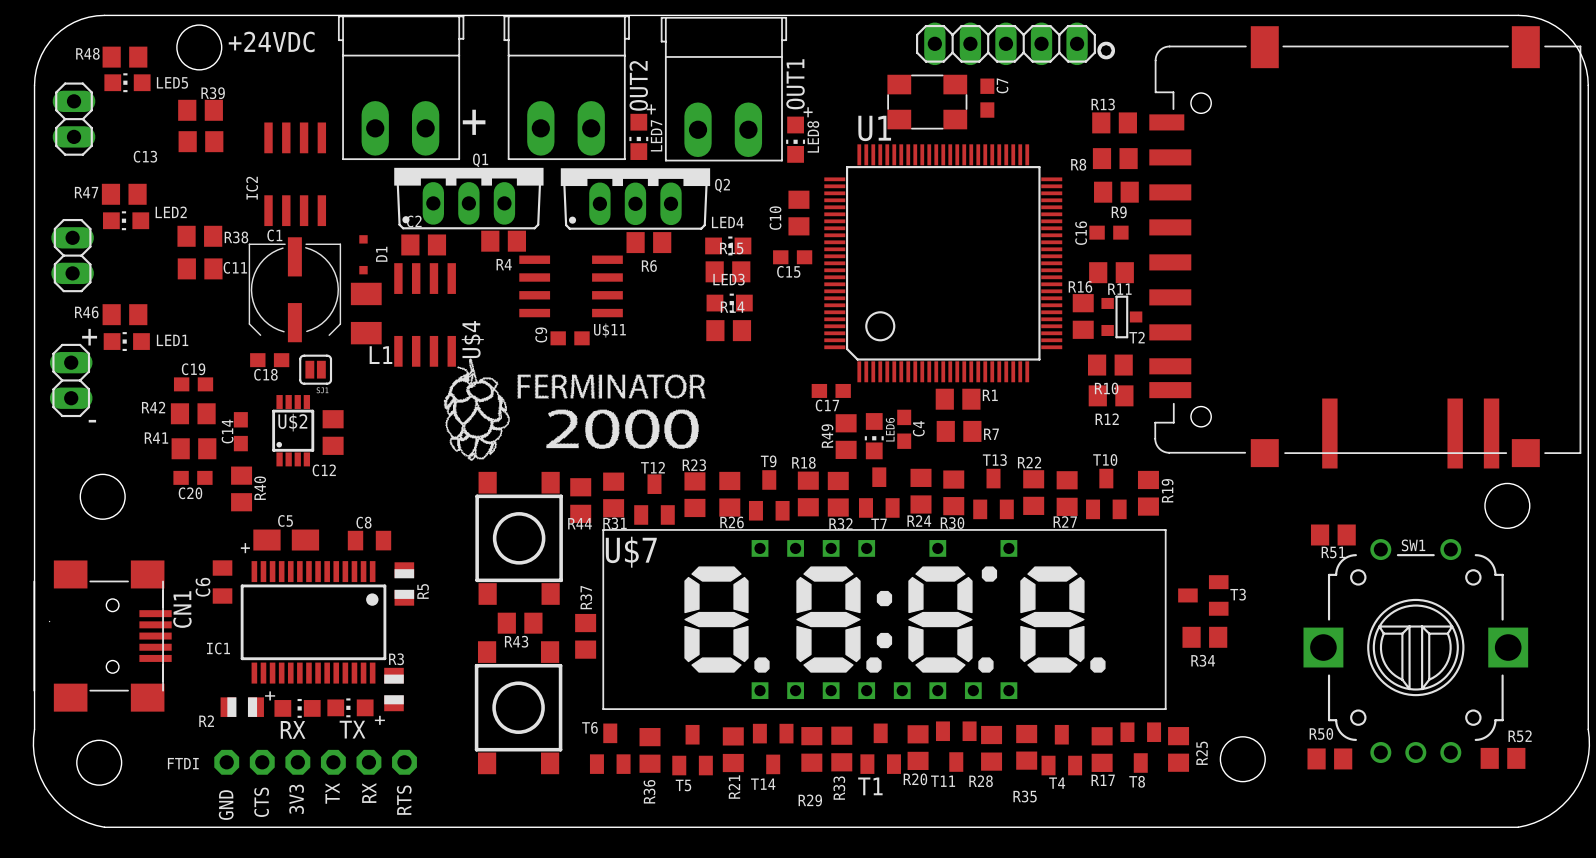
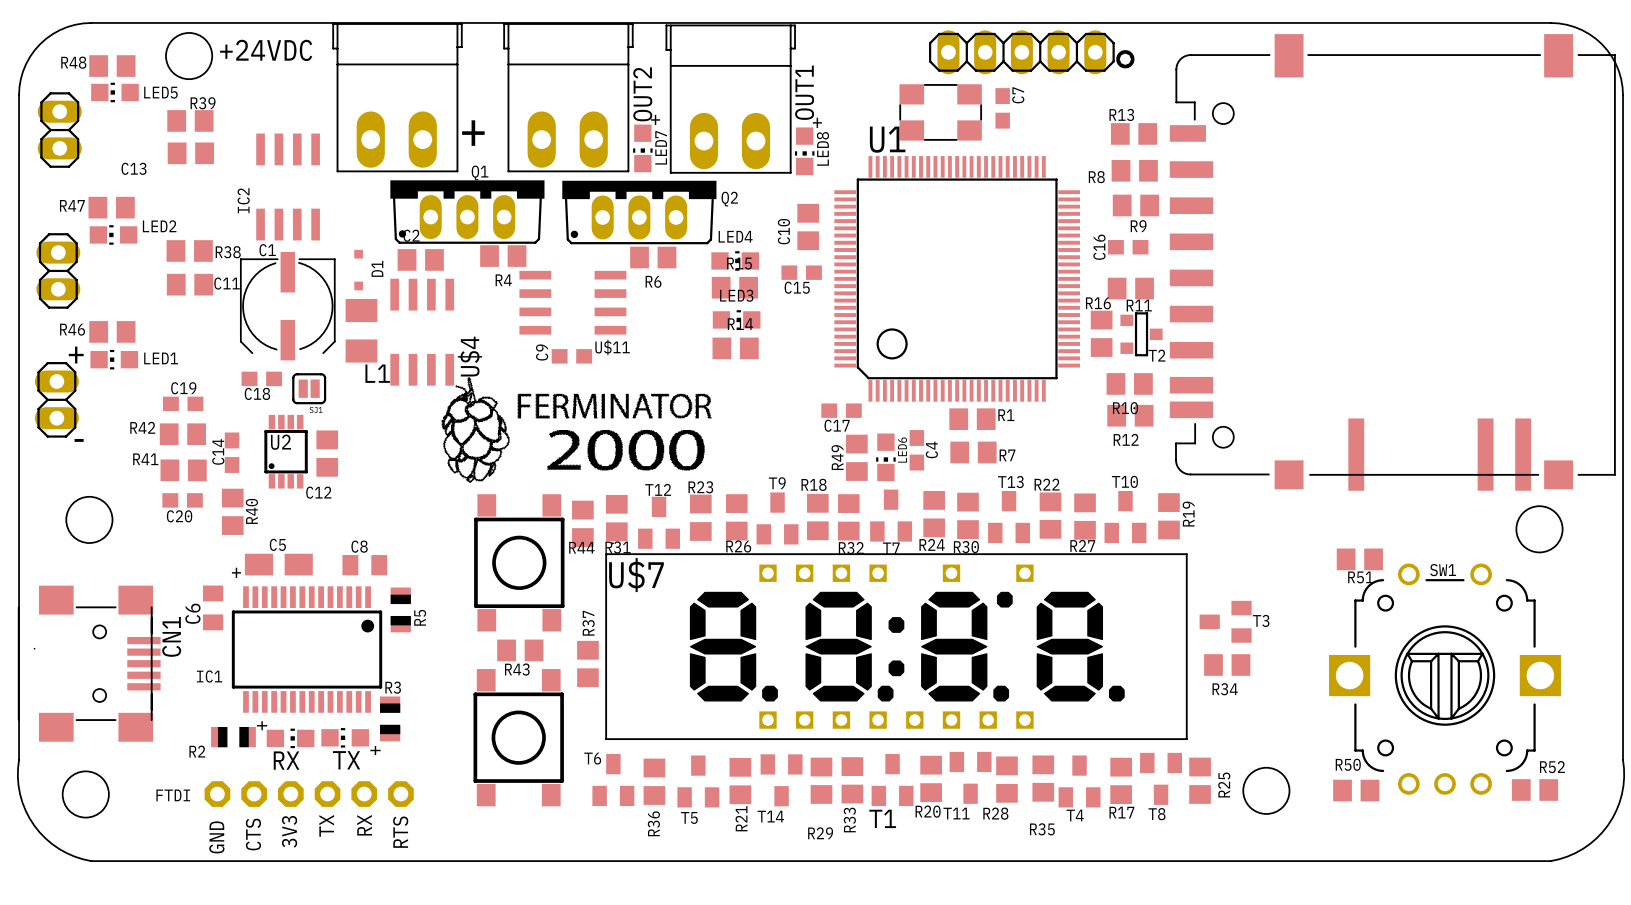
U$2 name: U$2 (292, 422) -> U2 (280, 442)

